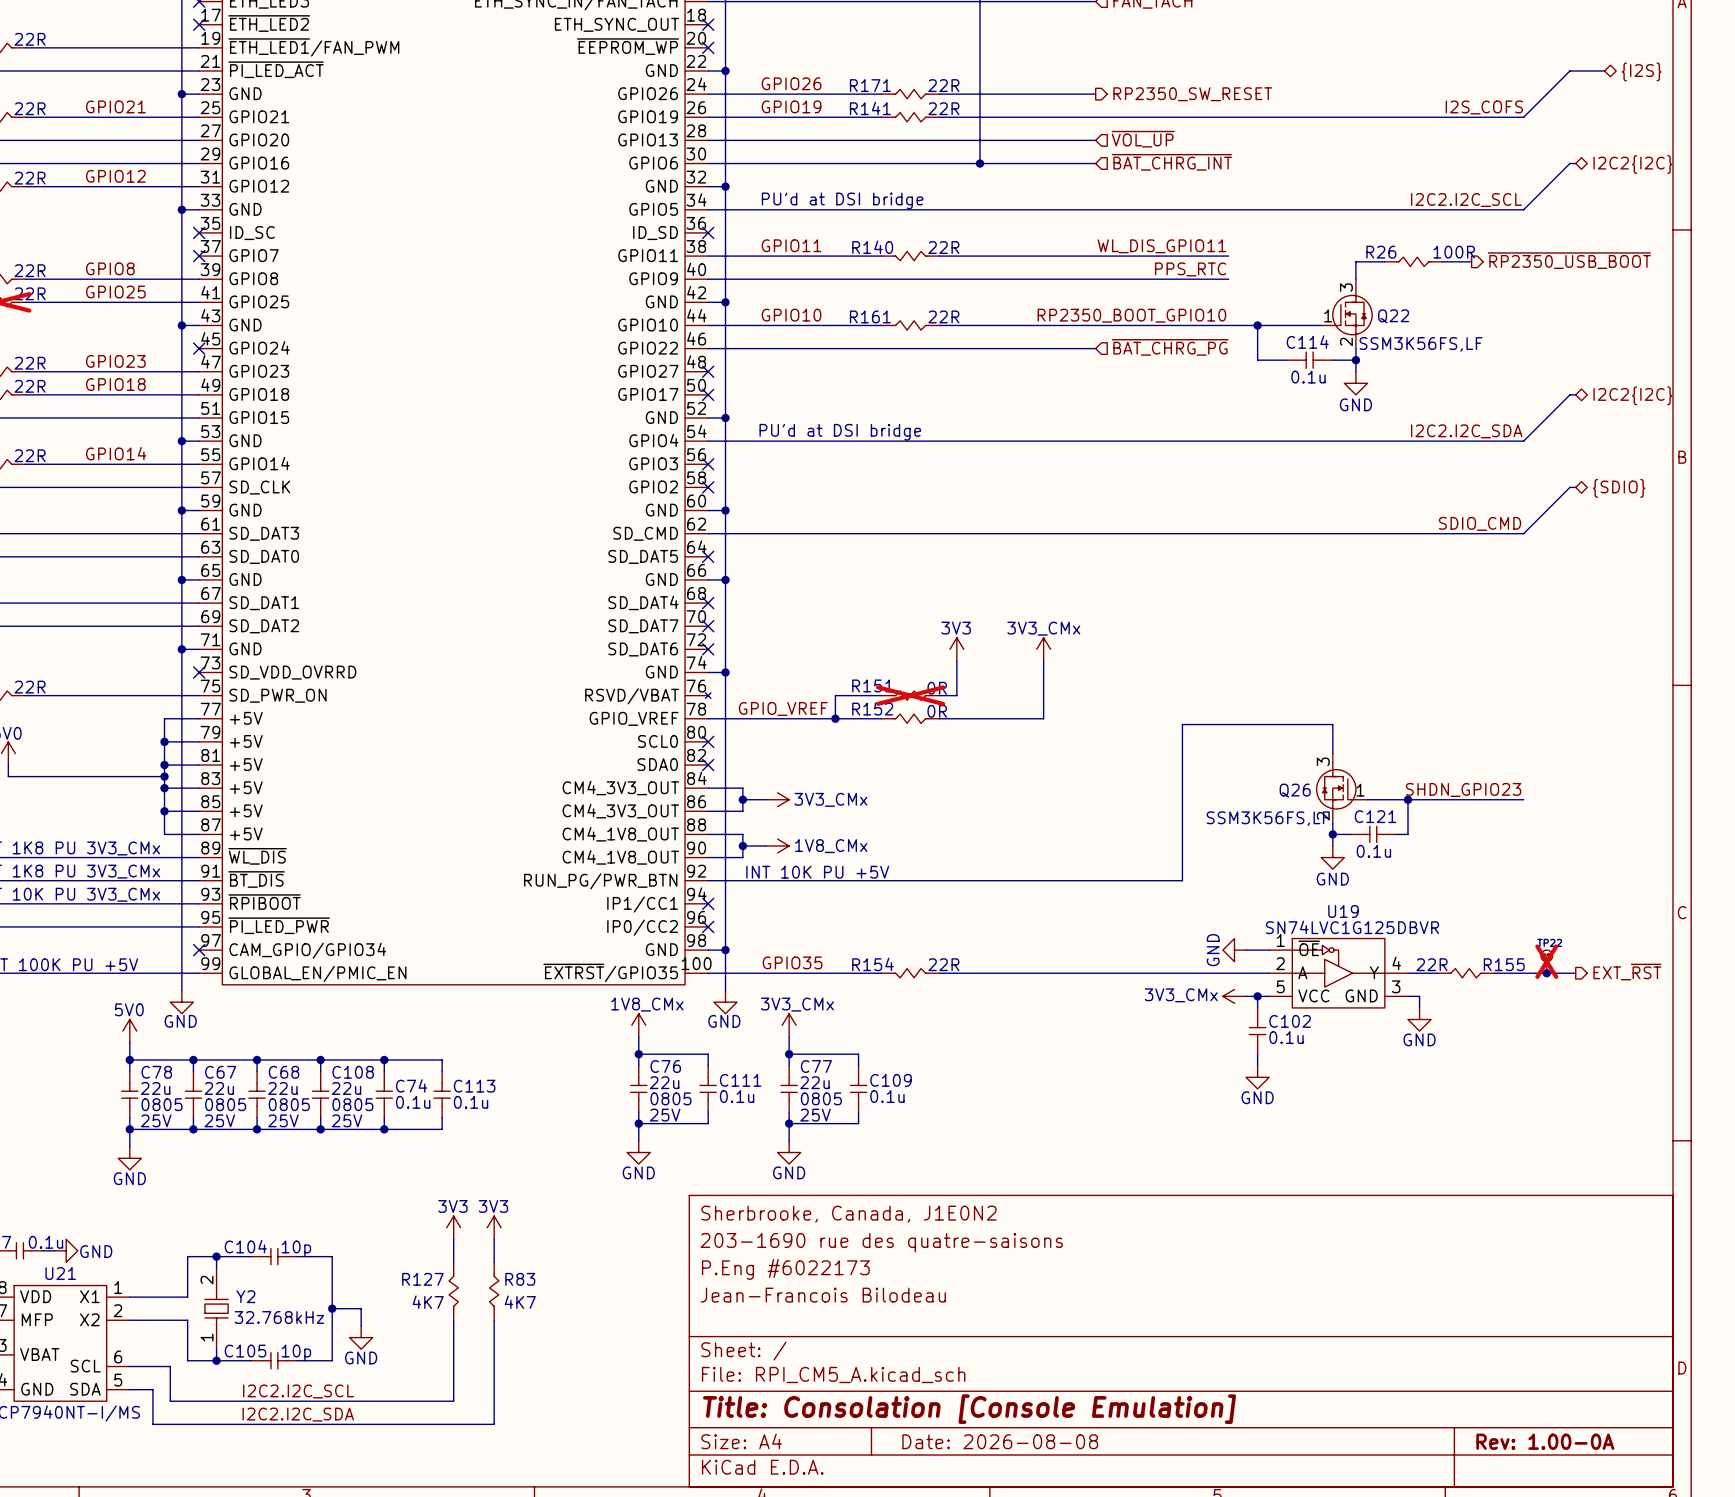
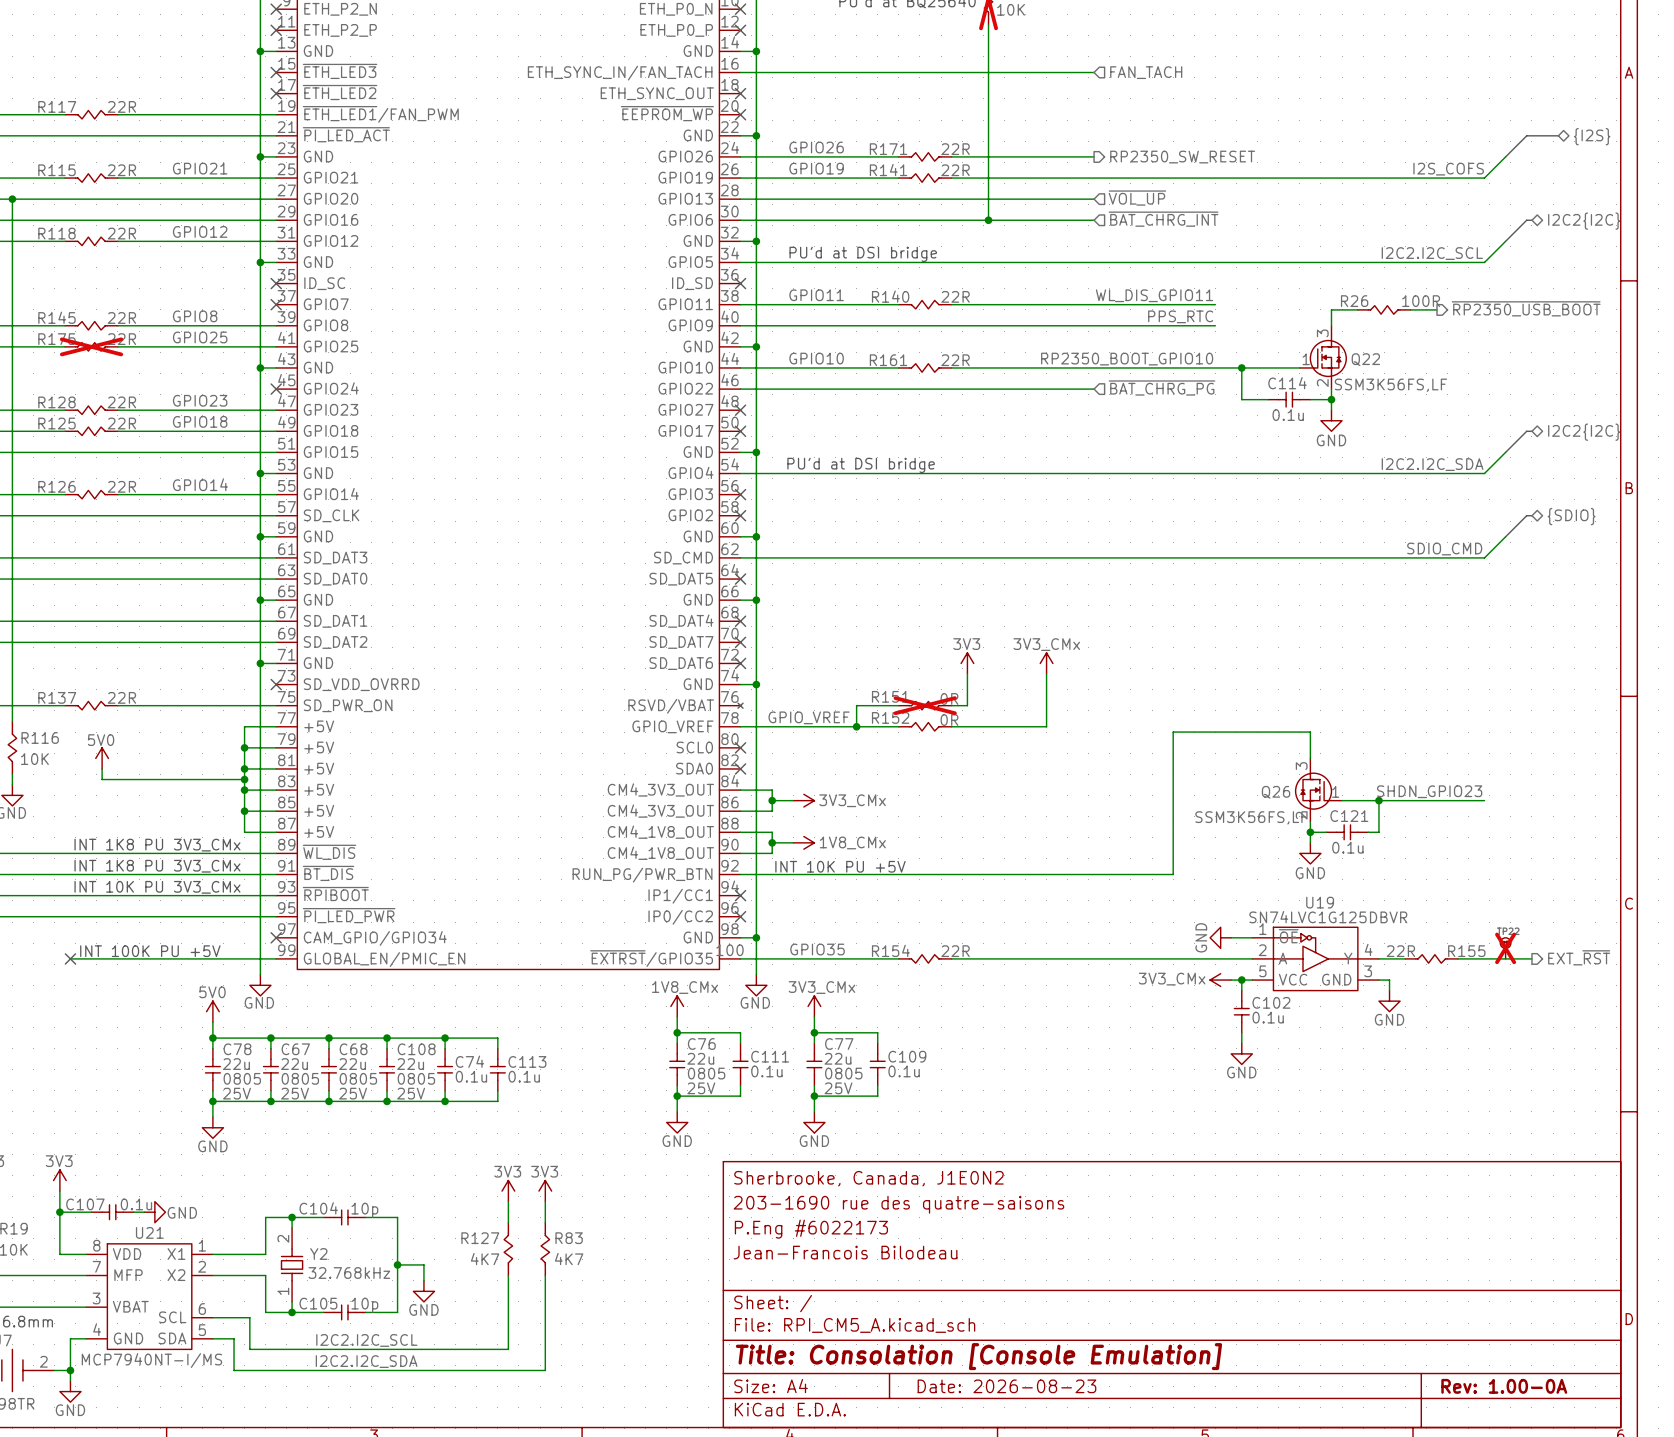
junction: (1546, 973) -> none
title block: Date: 2026-08-08 (1000, 1441) -> Date: 2026-08-23 (1006, 1386)

